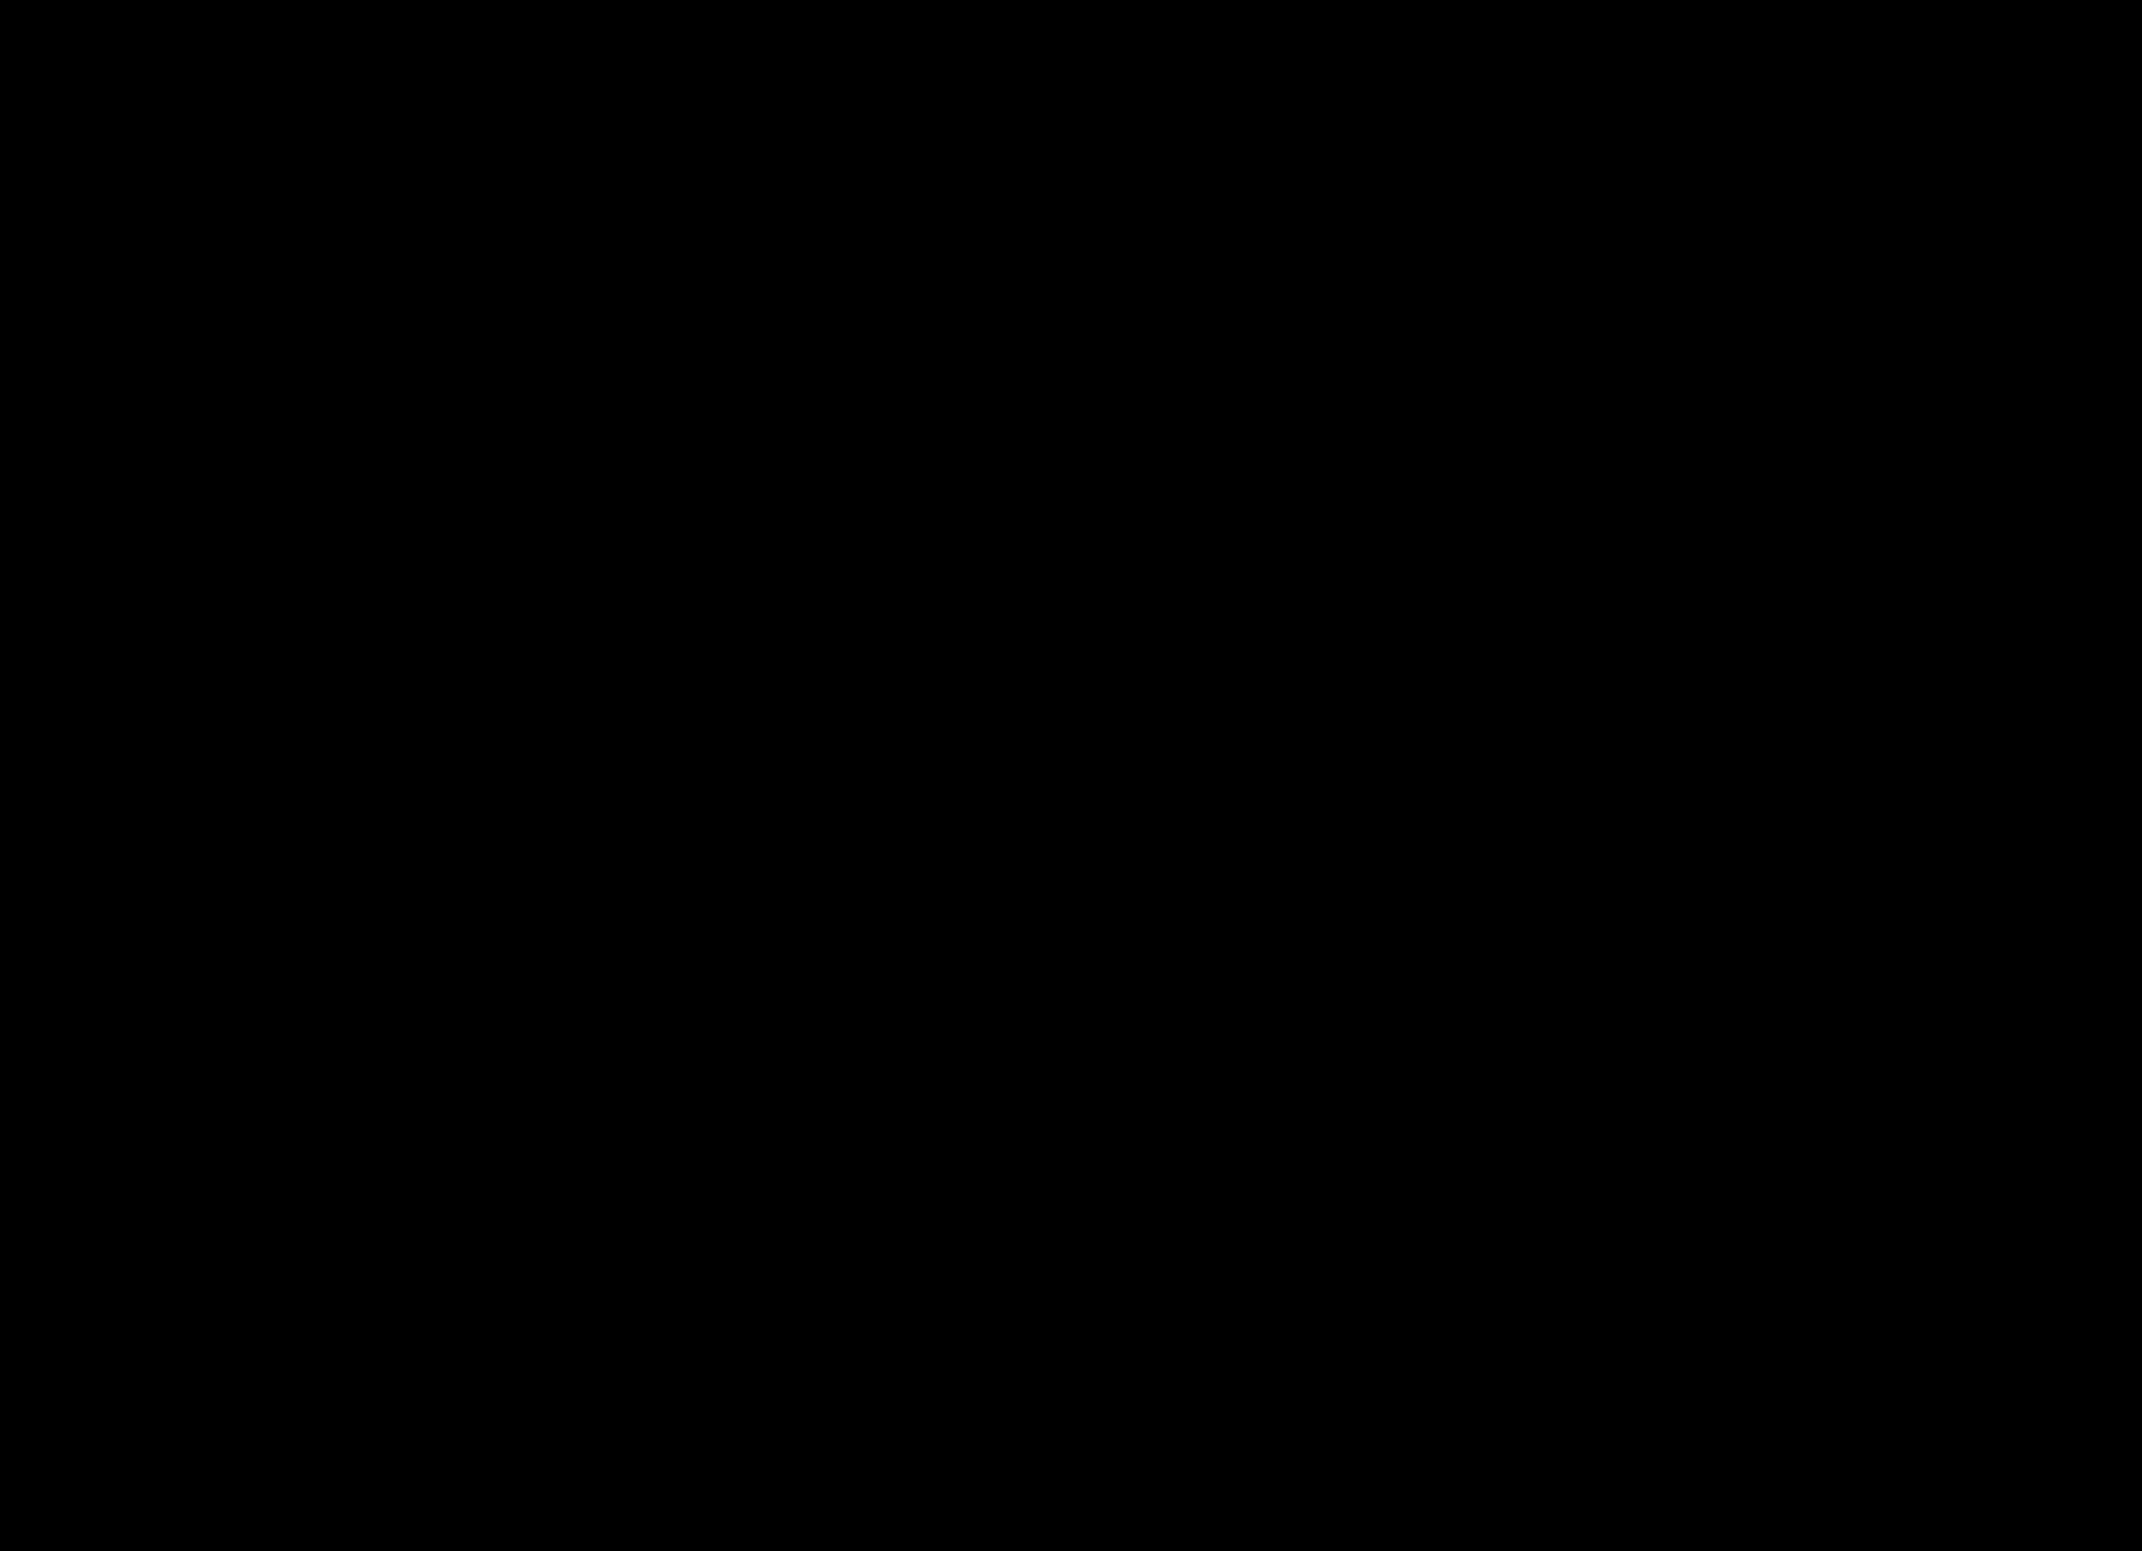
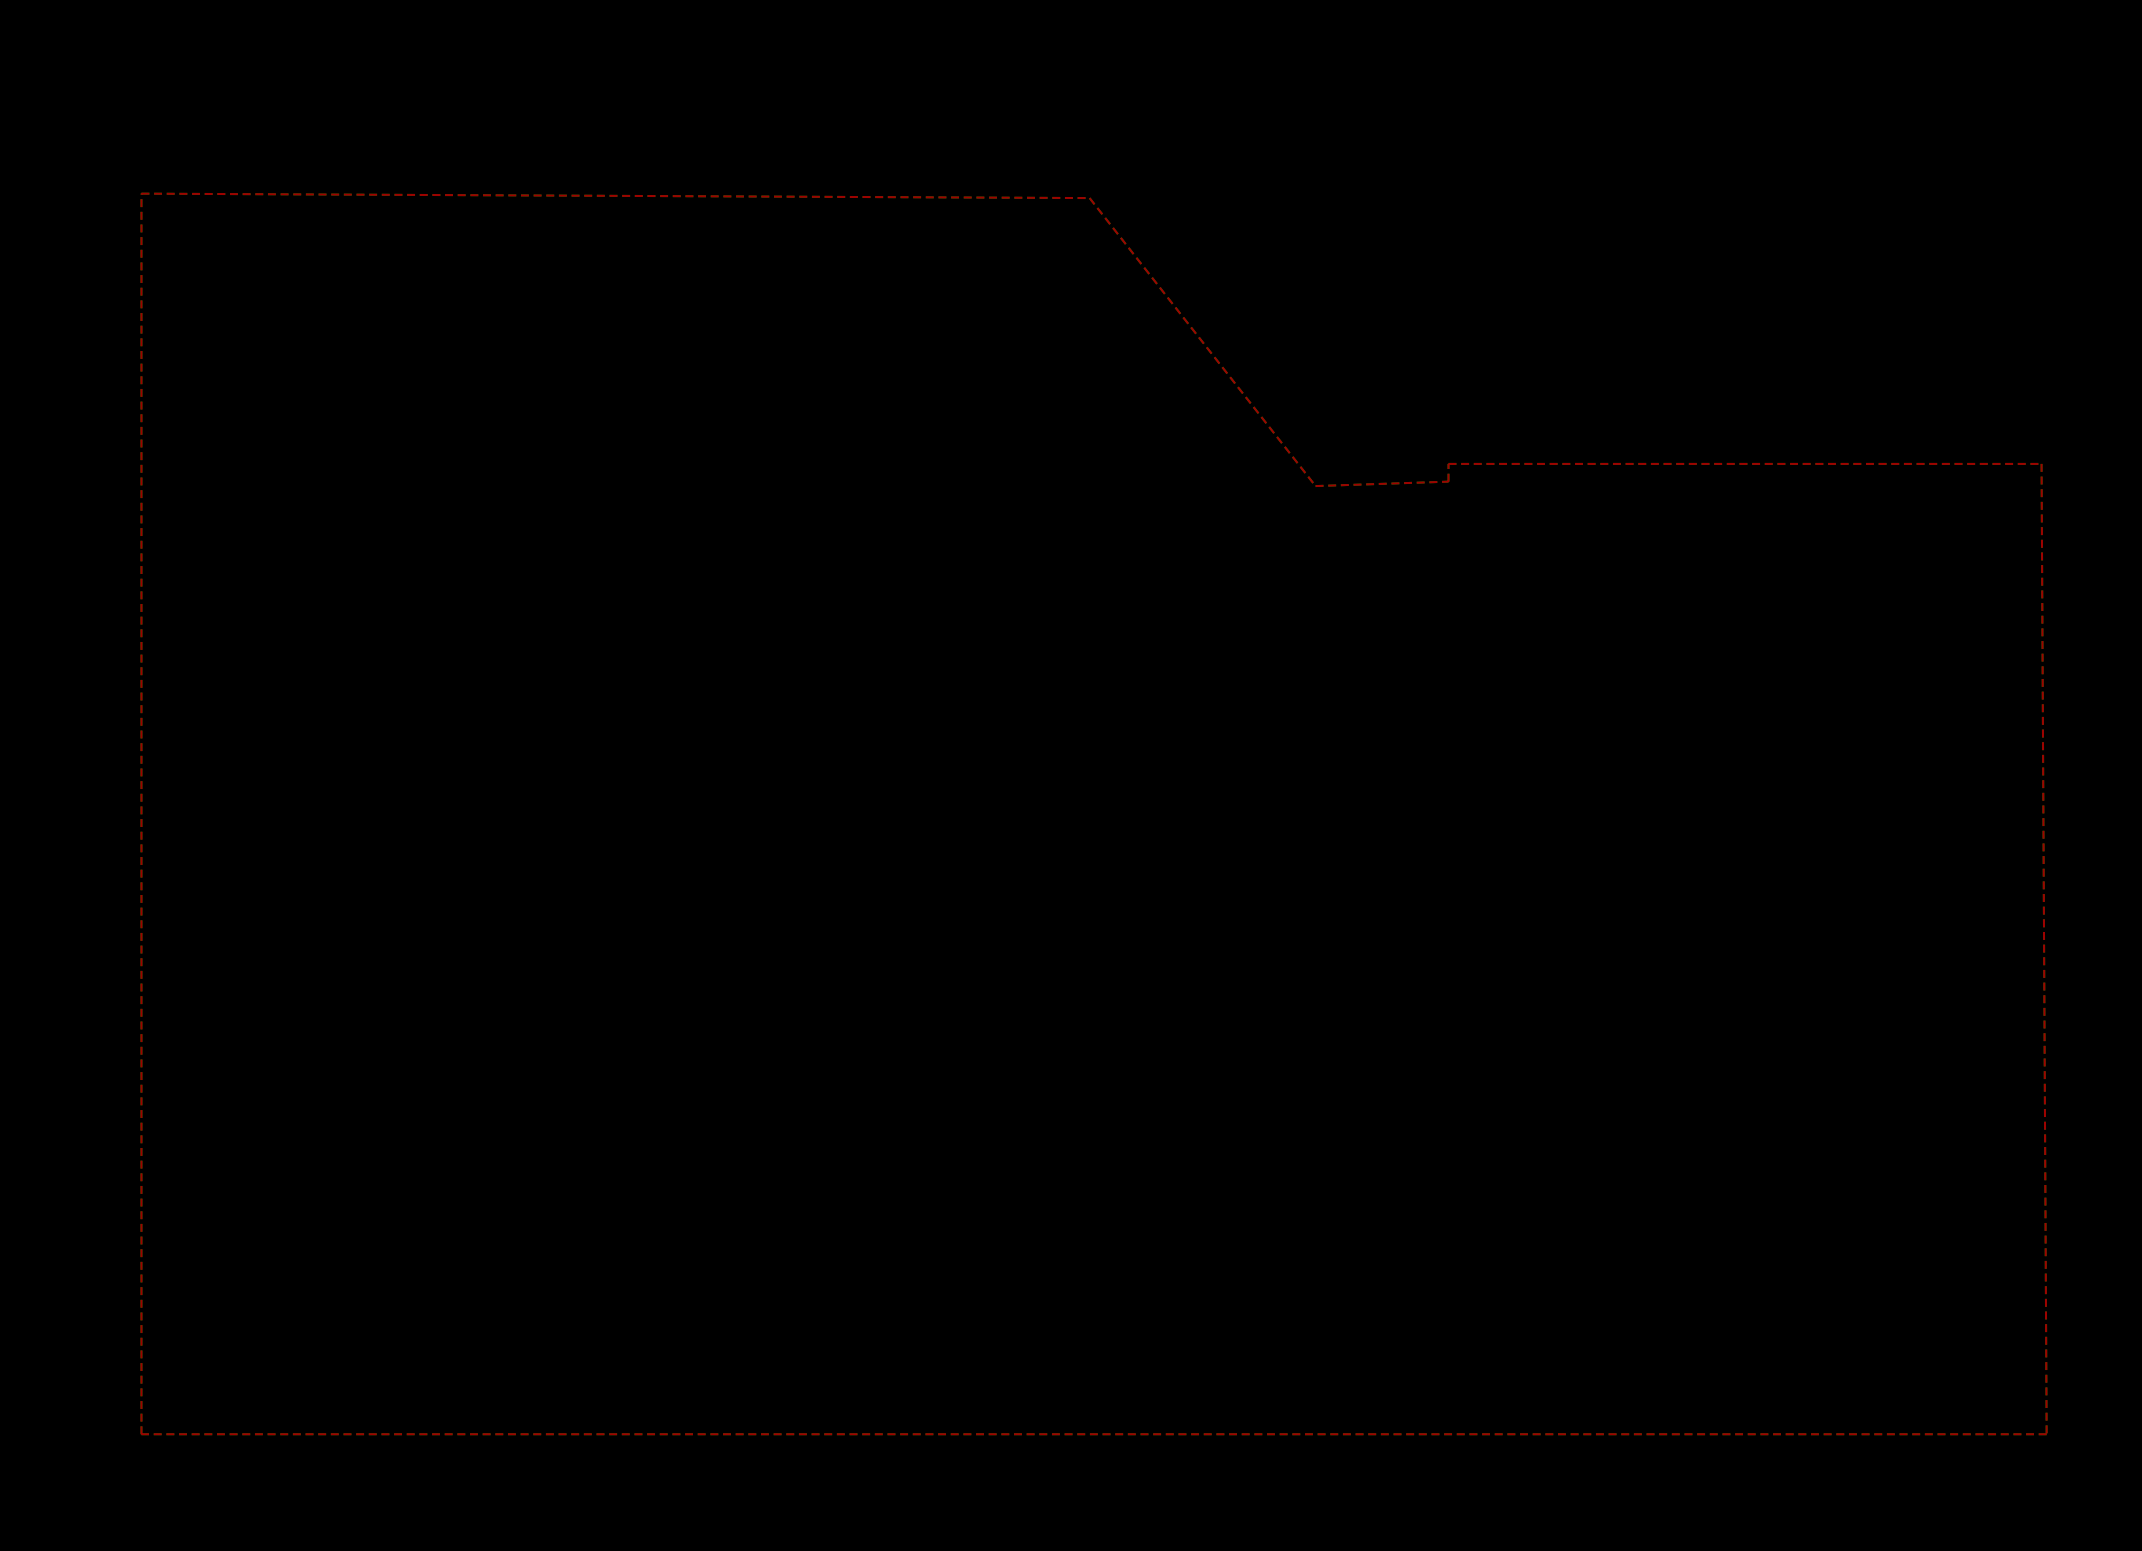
top zone outline: none -> (141, 193) (141, 1434) (2046, 1434) (2041, 463) (1448, 463) (1448, 481) (1315, 486) (1089, 198) (141, 193)

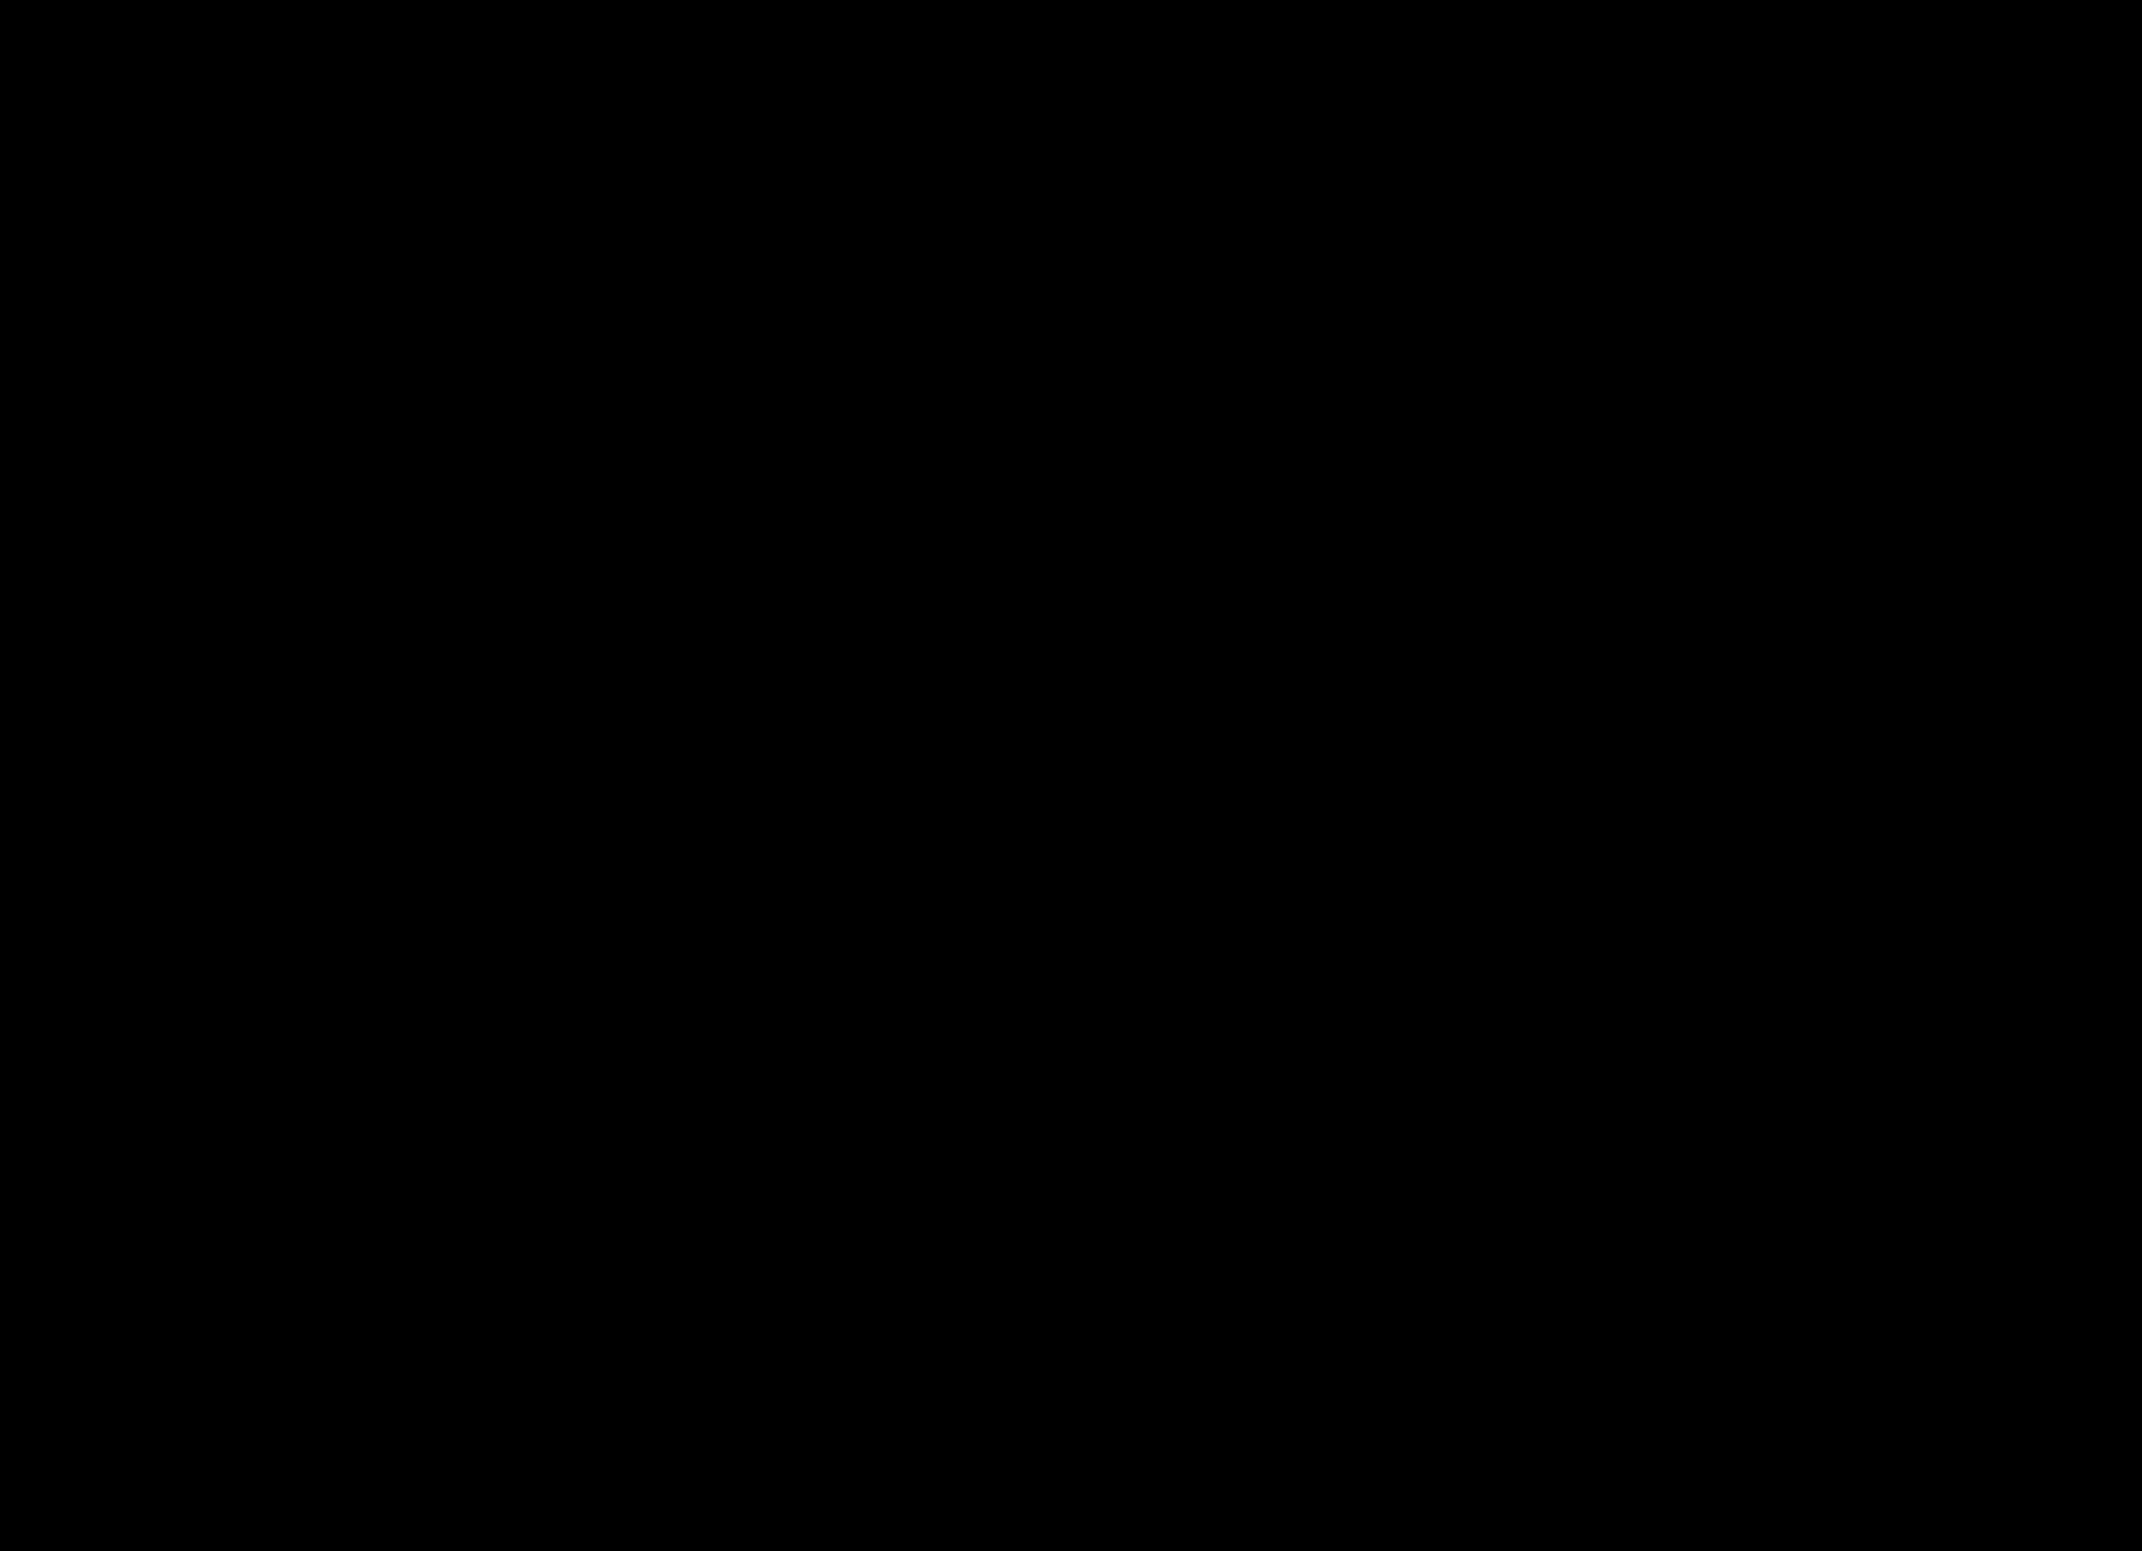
top zone outline: (141, 193) (141, 1434) (2046, 1434) (2041, 463) (1448, 463) (1448, 481) (1315, 486) (1089, 198) (141, 193) -> none

